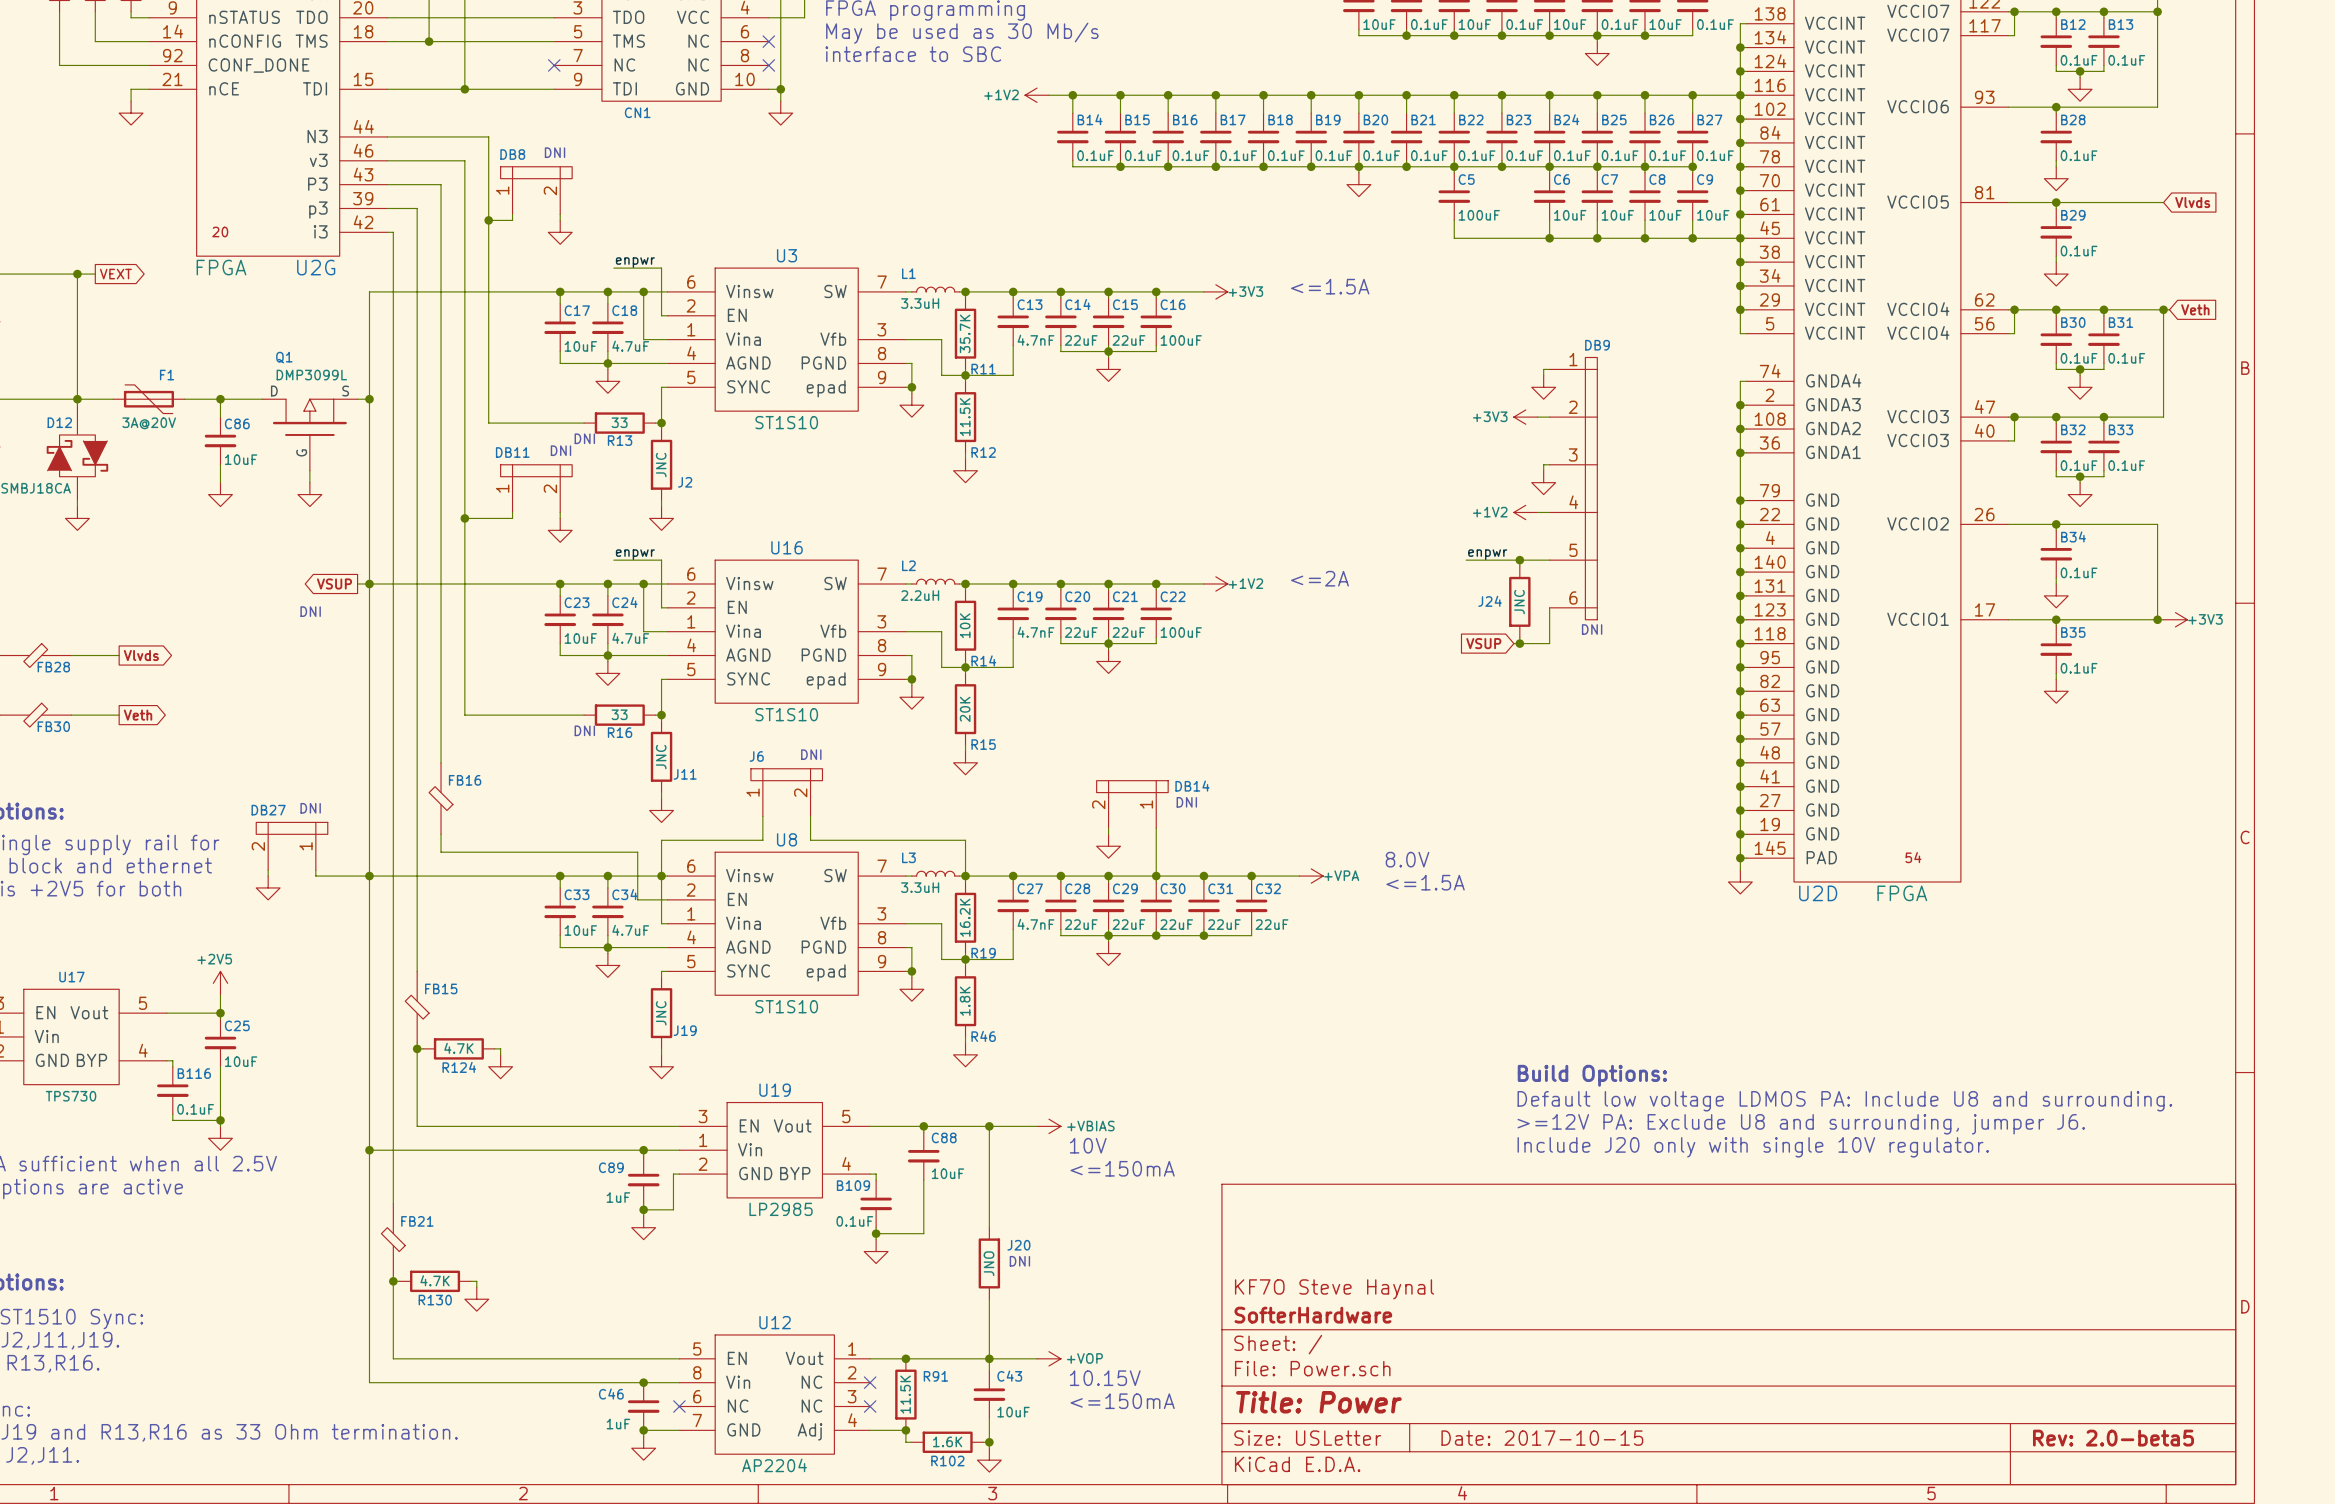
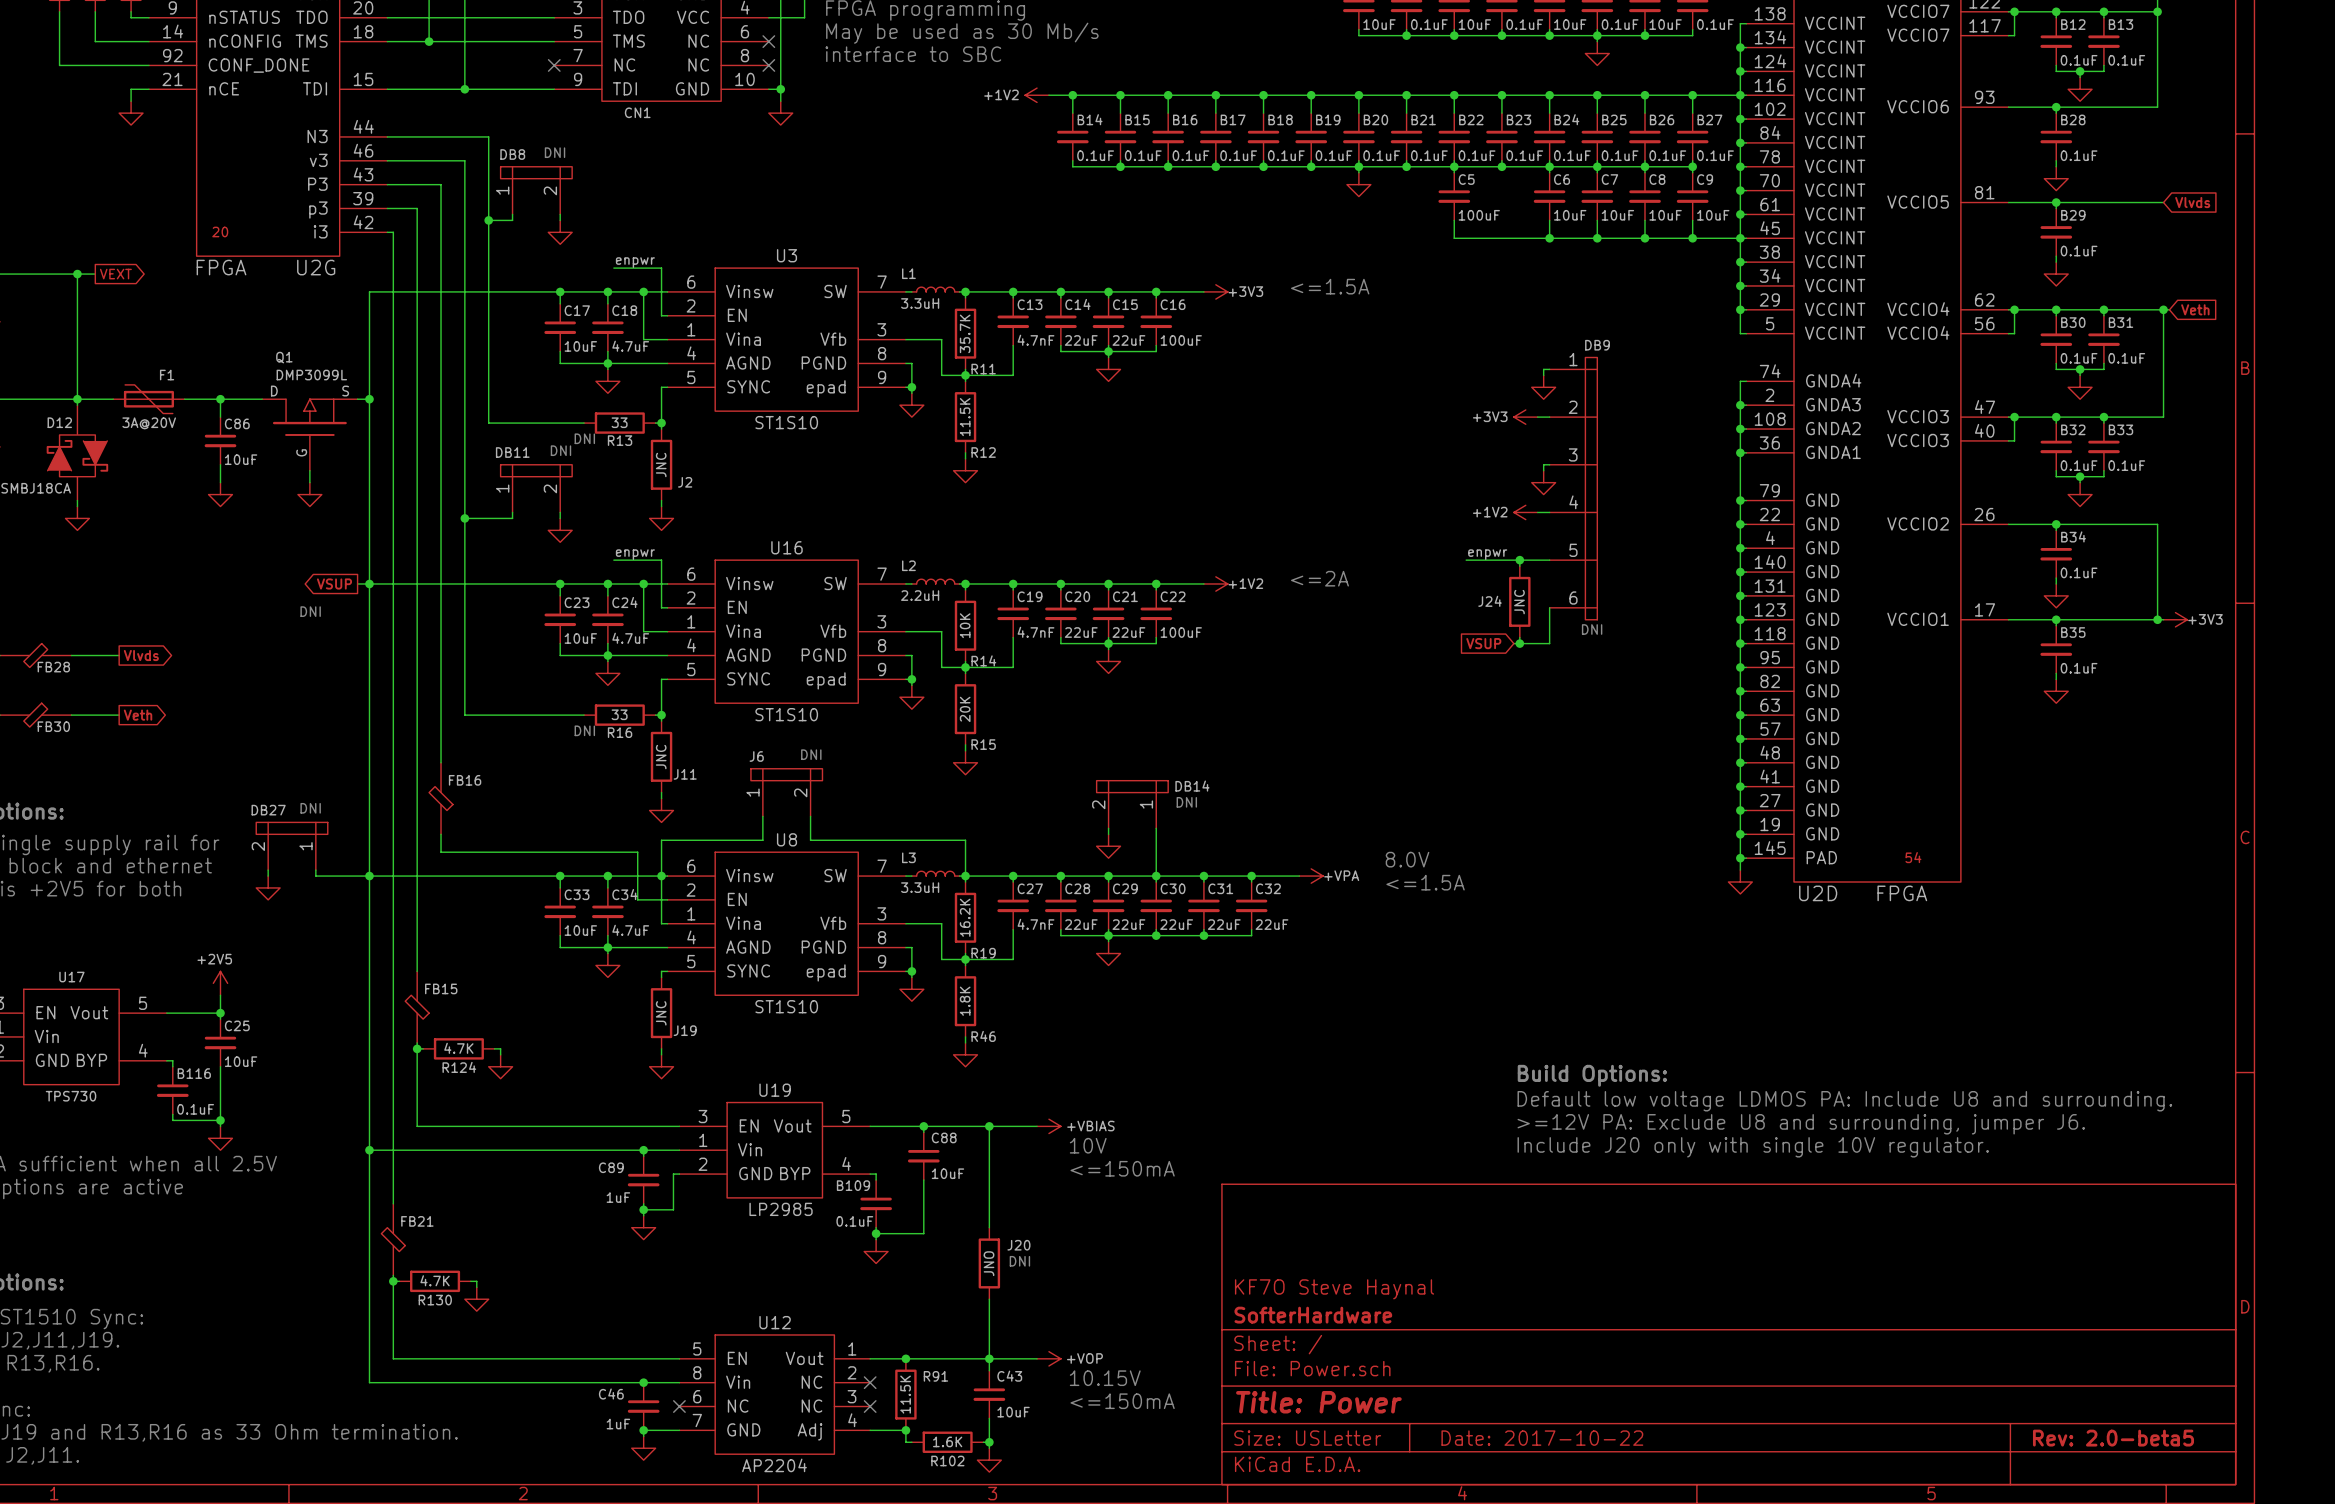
title block: Date: 2017-10-15 (1542, 1438) -> Date: 2017-10-22 (1542, 1438)

